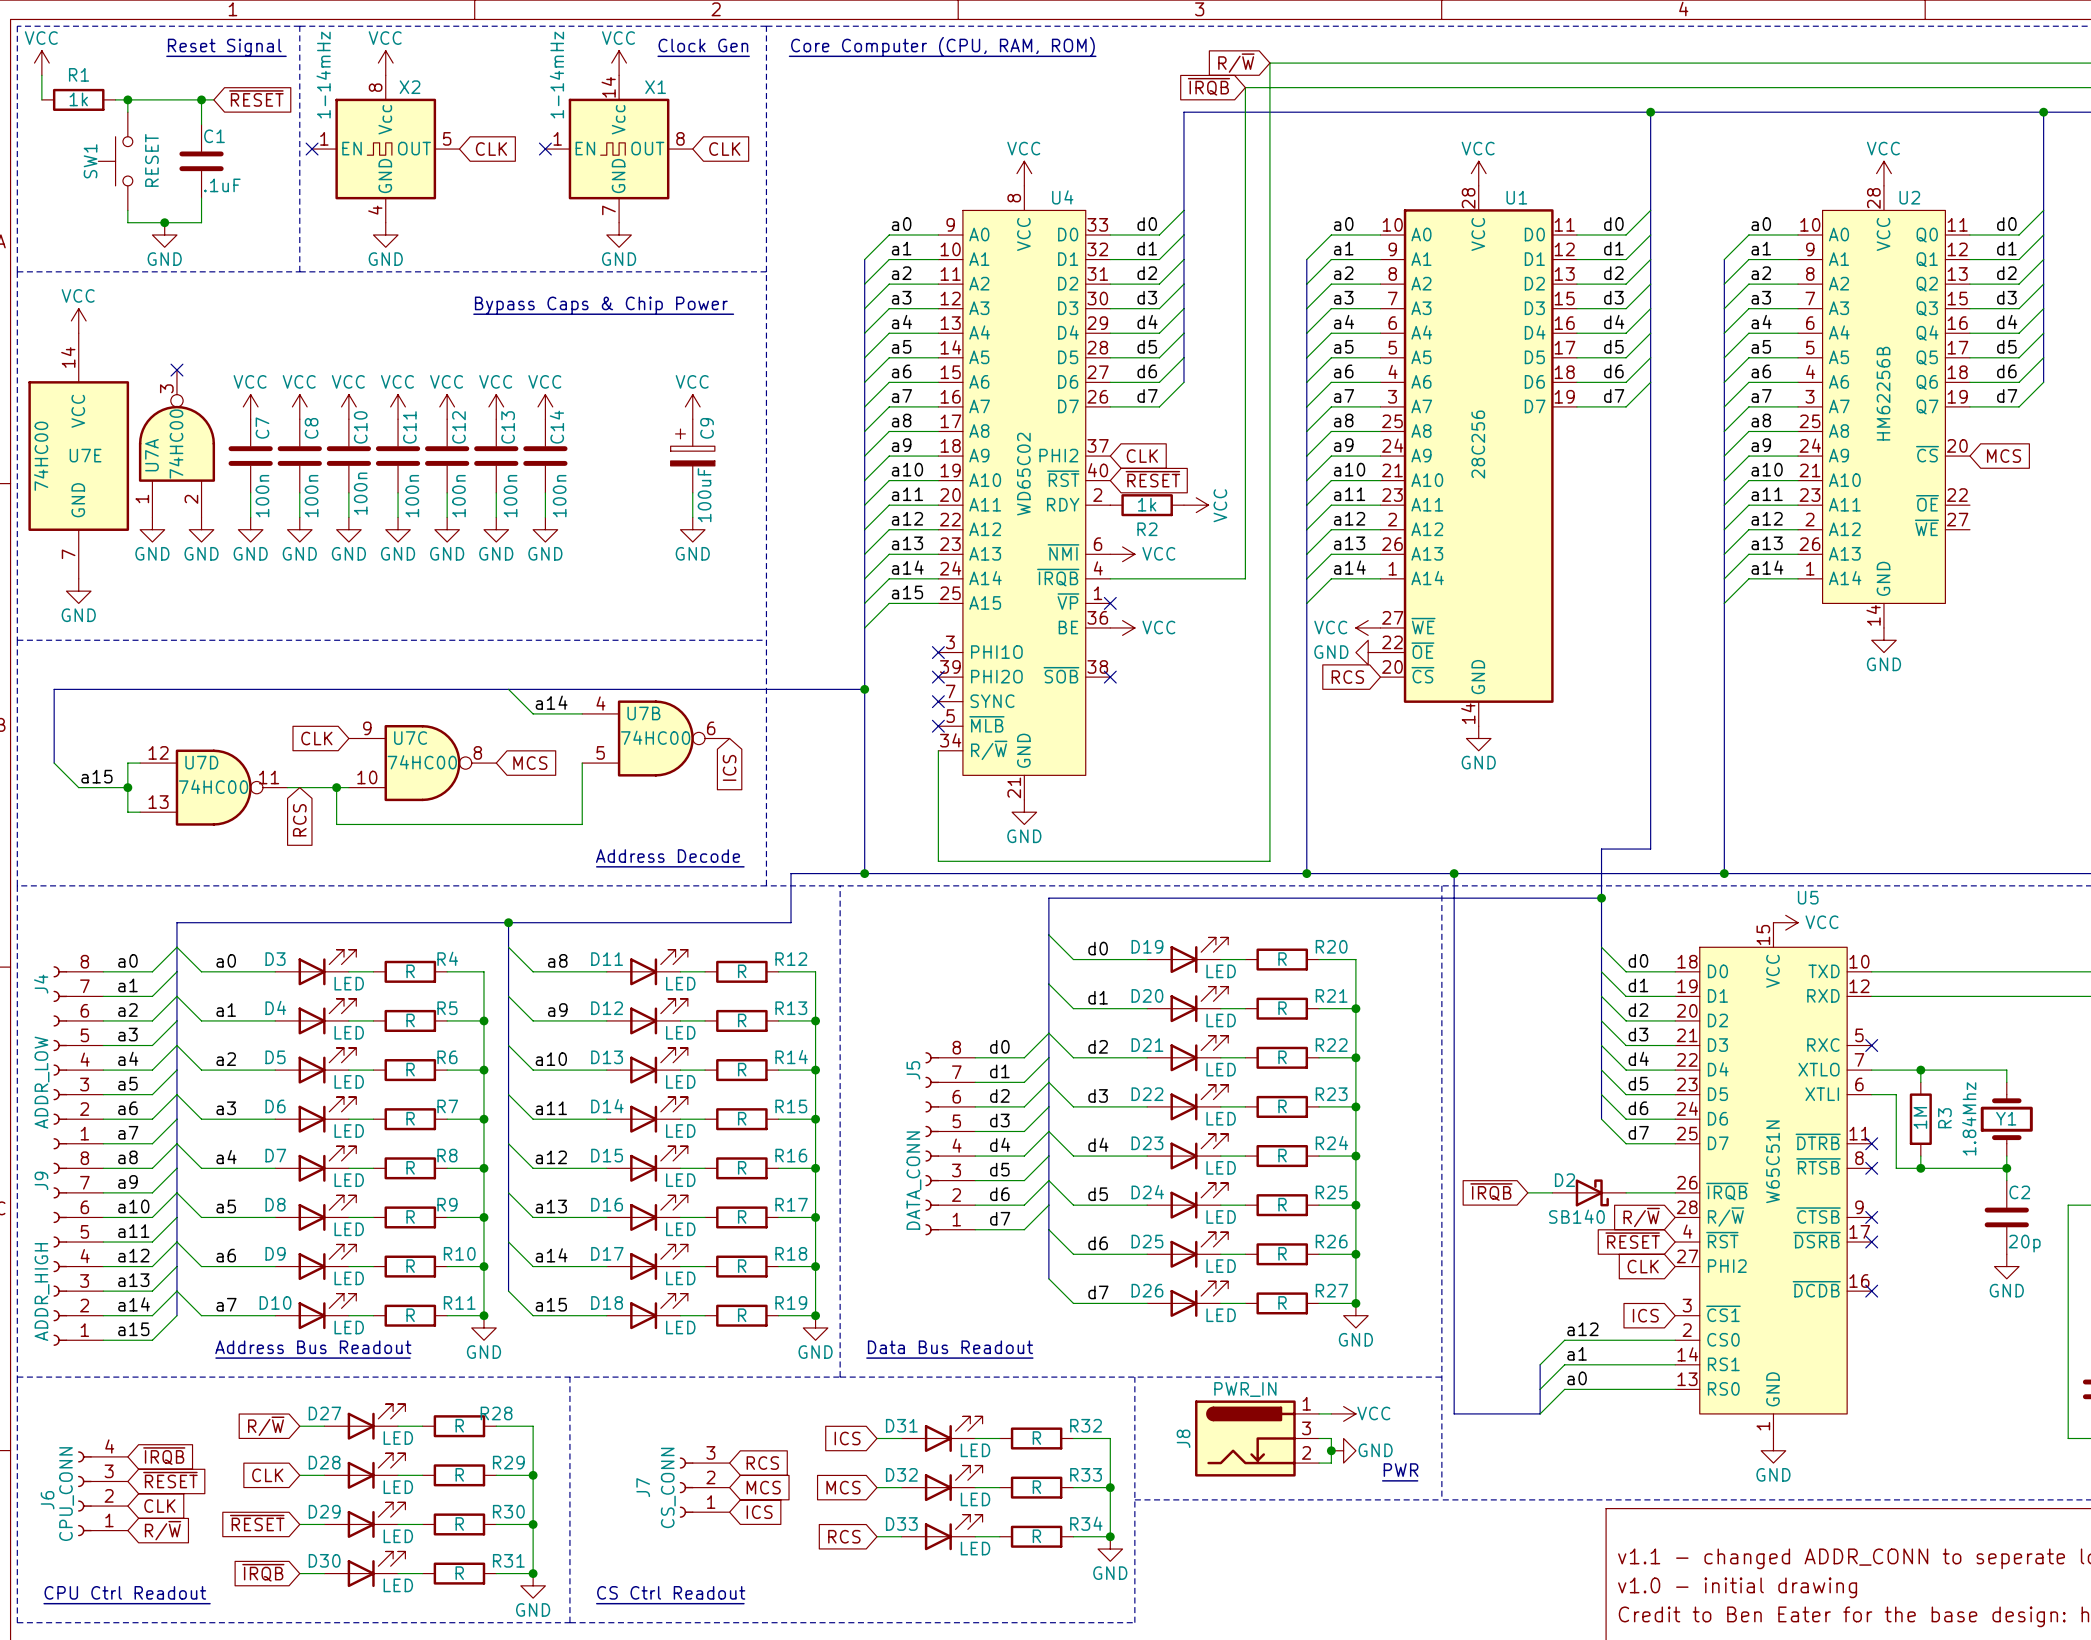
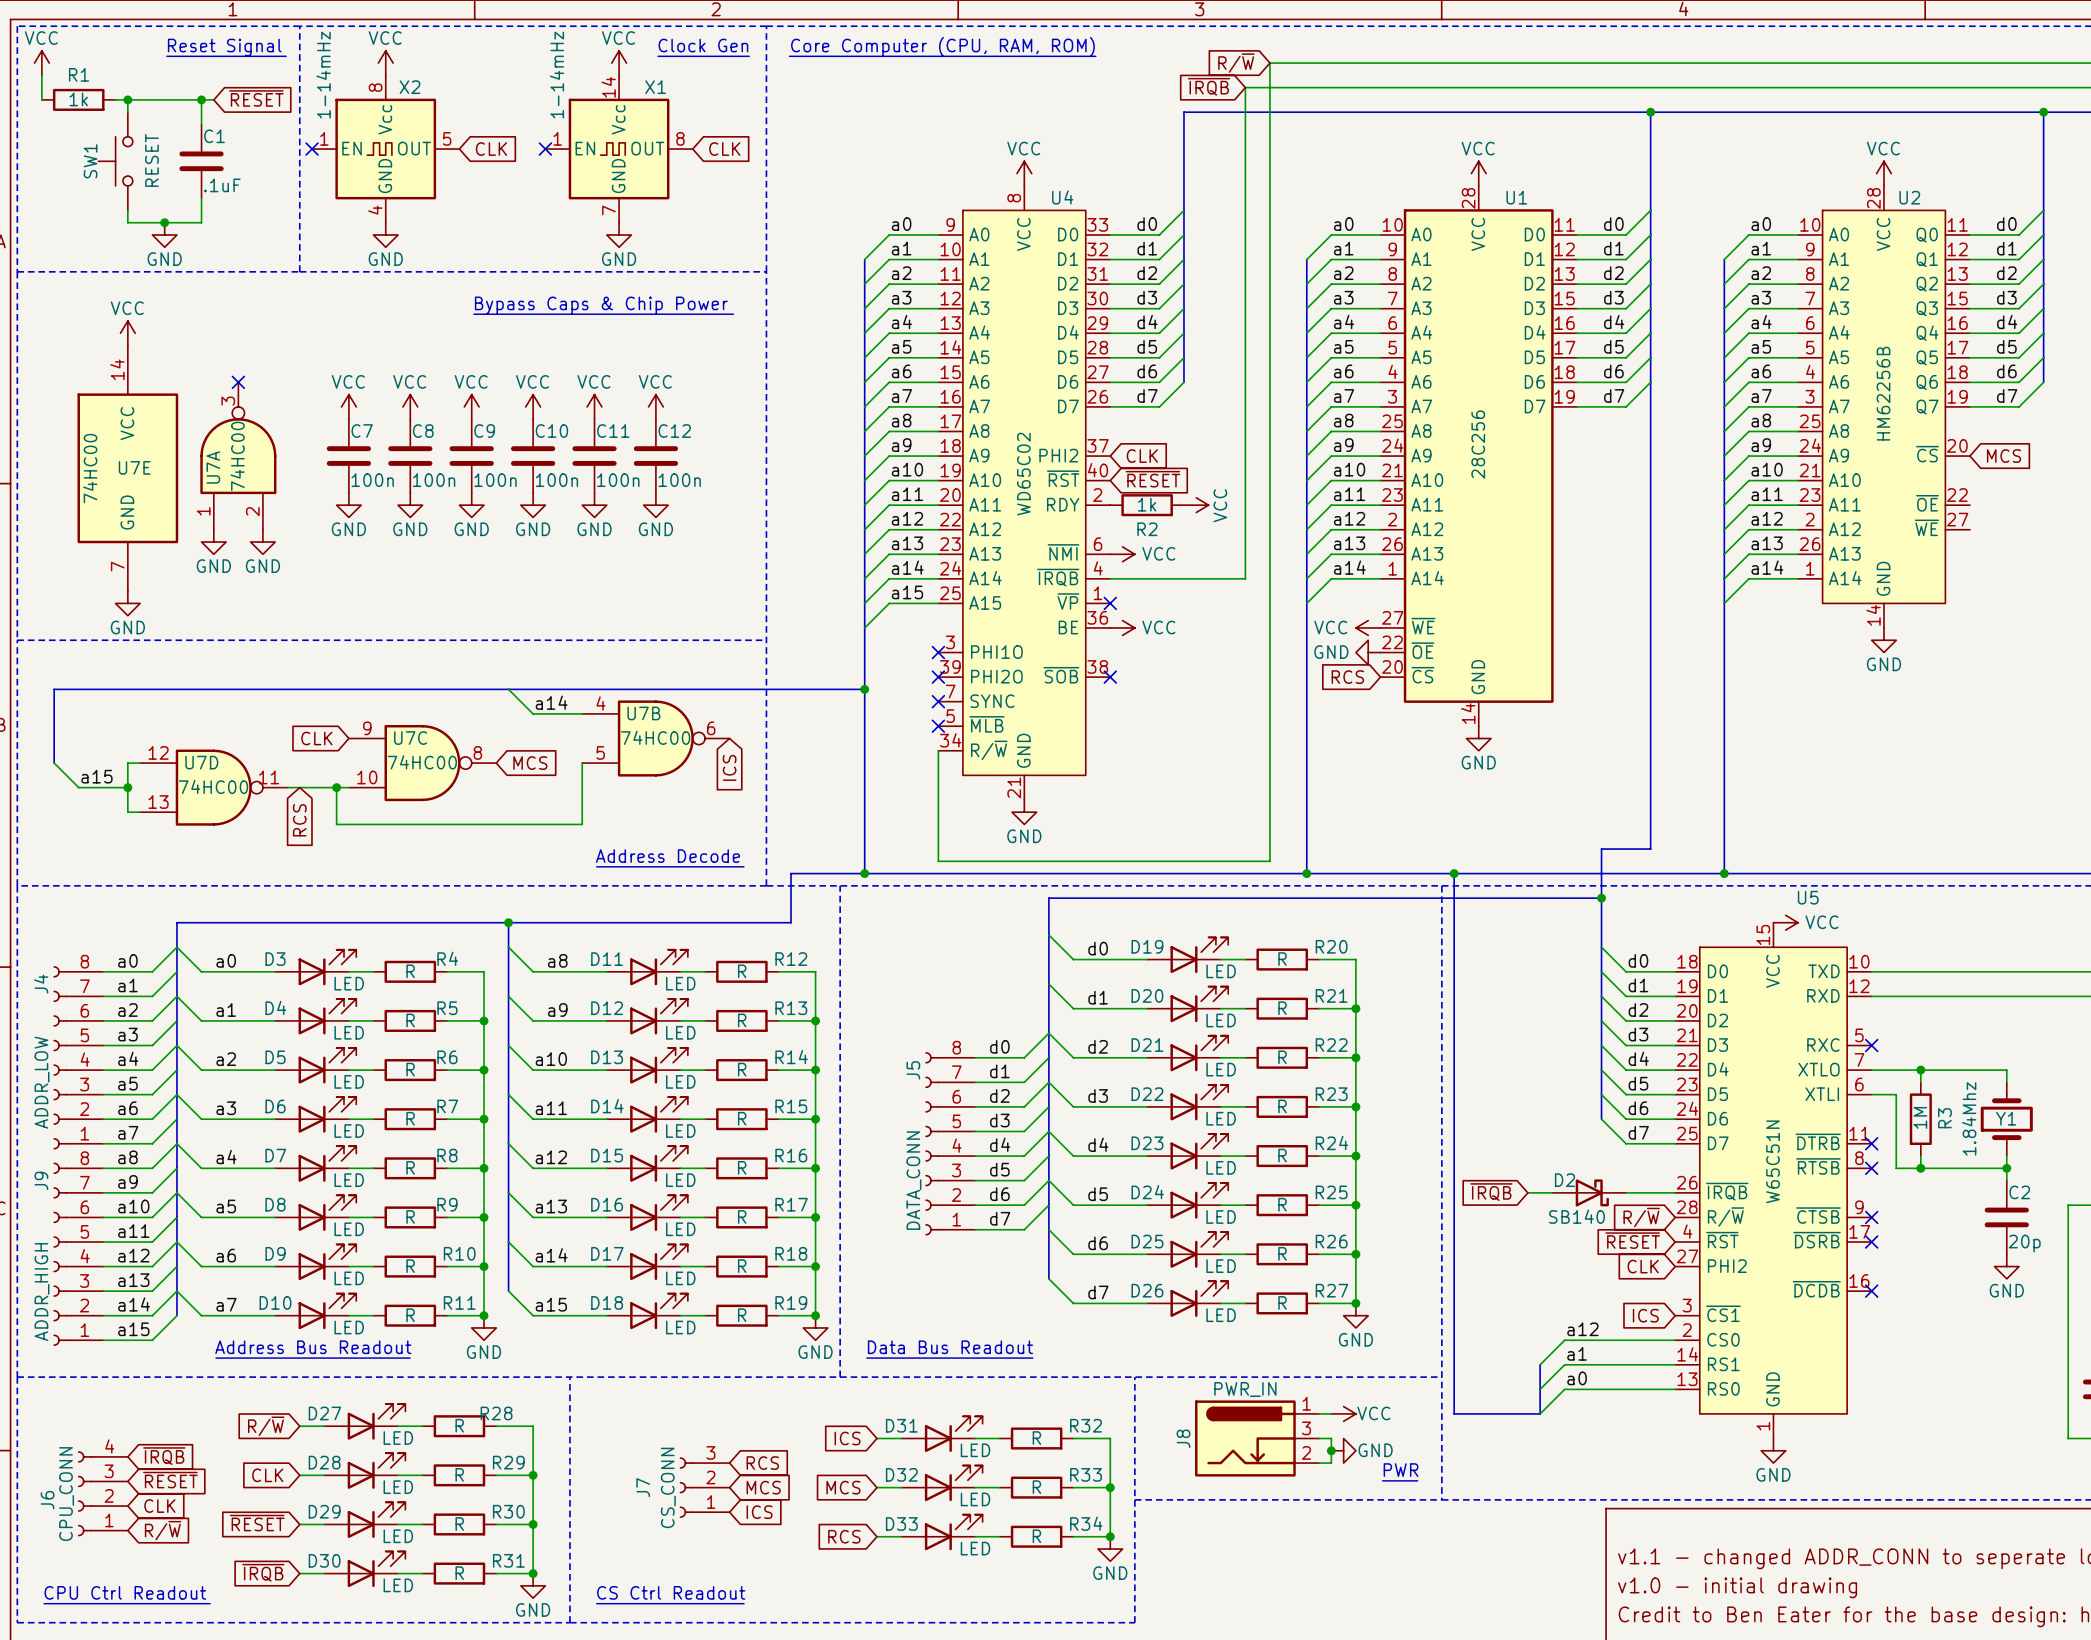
power symbol position: VCC (78, 320) -> VCC (127, 333)
no-connect mark: (176, 370) -> none
no-connect mark: none -> (238, 382)
power symbol: VCC (250, 406) -> none
power symbol: VCC (299, 406) -> none
power symbol position: VCC (398, 406) -> VCC (410, 406)
power symbol: VCC (447, 406) -> none
power symbol: none -> VCC (471, 406)
power symbol: VCC (496, 406) -> none
power symbol position: VCC (545, 406) -> VCC (533, 406)
power symbol: none -> VCC (594, 406)
power symbol position: VCC (692, 406) -> VCC (655, 406)
C9 symbol: [670, 419, 715, 493] -> [449, 419, 494, 493]
C10 name: C10 (360, 427) -> C7 (362, 431)
C11 name rotation: 0° (409, 427) -> 90° clockwise (613, 431)
C12 name rotation: 0° (458, 427) -> 90° clockwise (674, 431)
C8 name rotation: 0° (311, 428) -> 90° clockwise (423, 431)
U7A position: (176, 443) -> (238, 456)
U7E position: (78, 456) -> (127, 468)
C7: 100n (250, 456) -> none
C8 position: (299, 456) -> (410, 456)
C11 position: (398, 456) -> (594, 456)
C12 position: (447, 456) -> (655, 456)
C13: 100n (496, 456) -> none
C10: none -> 100n (533, 456)
C14: 100n (545, 456) -> none
wire: (250, 492) (250, 517) -> none
wire: (299, 492) (299, 517) -> none
wire: (398, 492) (398, 517) -> none
wire: (447, 492) (447, 517) -> none
wire: (496, 492) (496, 517) -> none
wire: (545, 492) (545, 517) -> none
wire: (692, 492) (692, 517) -> none
C10 value rotation: 0° (360, 493) -> 90° clockwise (372, 480)
C9 value: 100uF (704, 495) -> 100n (495, 480)
C8 value rotation: 0° (311, 496) -> 90° clockwise (434, 480)
C11 value rotation: 0° (412, 496) -> 90° clockwise (618, 480)
C12 value rotation: 0° (458, 496) -> 90° clockwise (679, 480)
power symbol: none -> GND (410, 505)
power symbol: none -> GND (471, 505)
power symbol: none -> GND (533, 505)
power symbol: none -> GND (594, 505)
power symbol: GND (152, 529) -> none
power symbol position: GND (201, 529) -> GND (213, 542)
power symbol position: GND (250, 529) -> GND (262, 542)
power symbol: GND (299, 529) -> none
power symbol position: GND (348, 529) -> GND (348, 505)
power symbol: GND (398, 529) -> none
power symbol: GND (447, 529) -> none
power symbol: GND (496, 529) -> none
power symbol: GND (545, 529) -> none
power symbol position: GND (692, 529) -> GND (655, 505)
power symbol: GND (78, 591) -> none
power symbol: none -> GND (127, 603)

